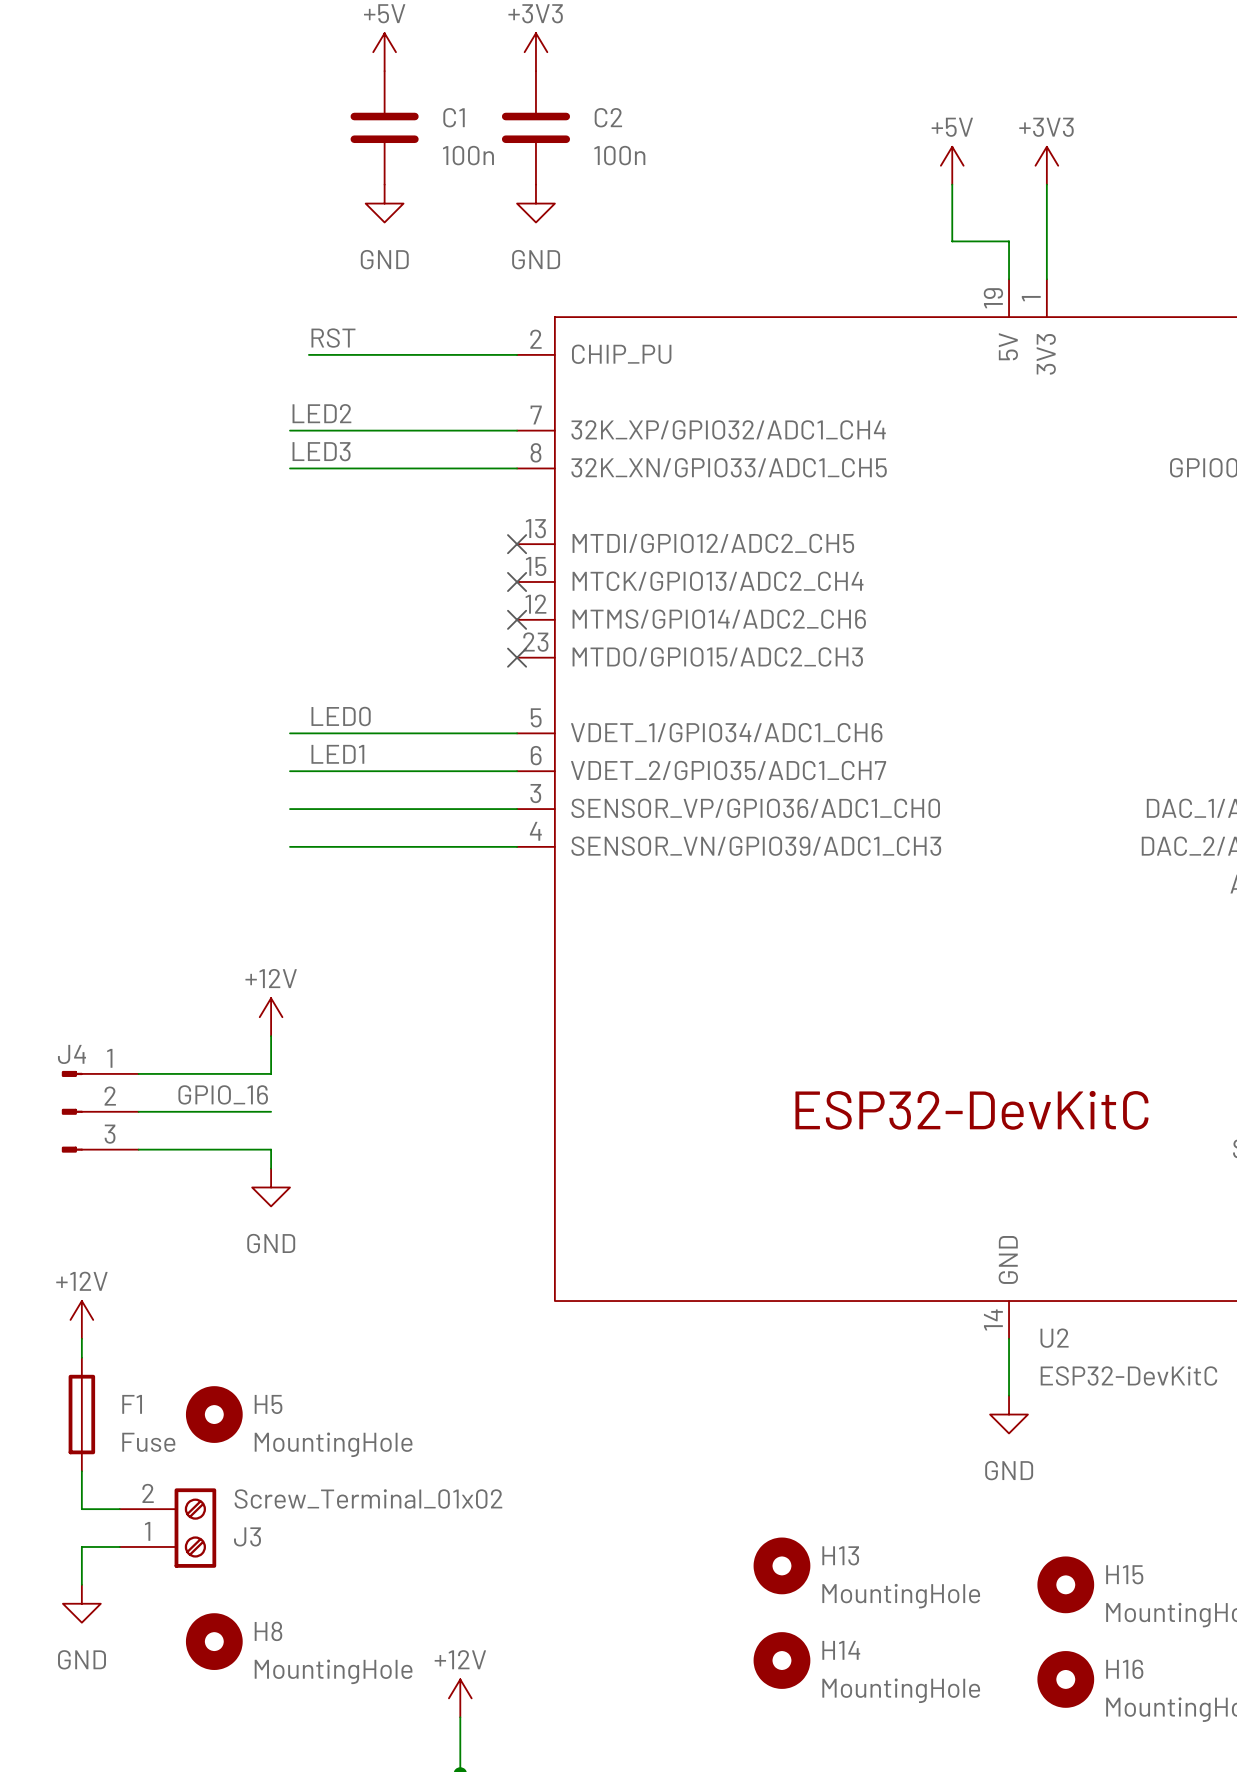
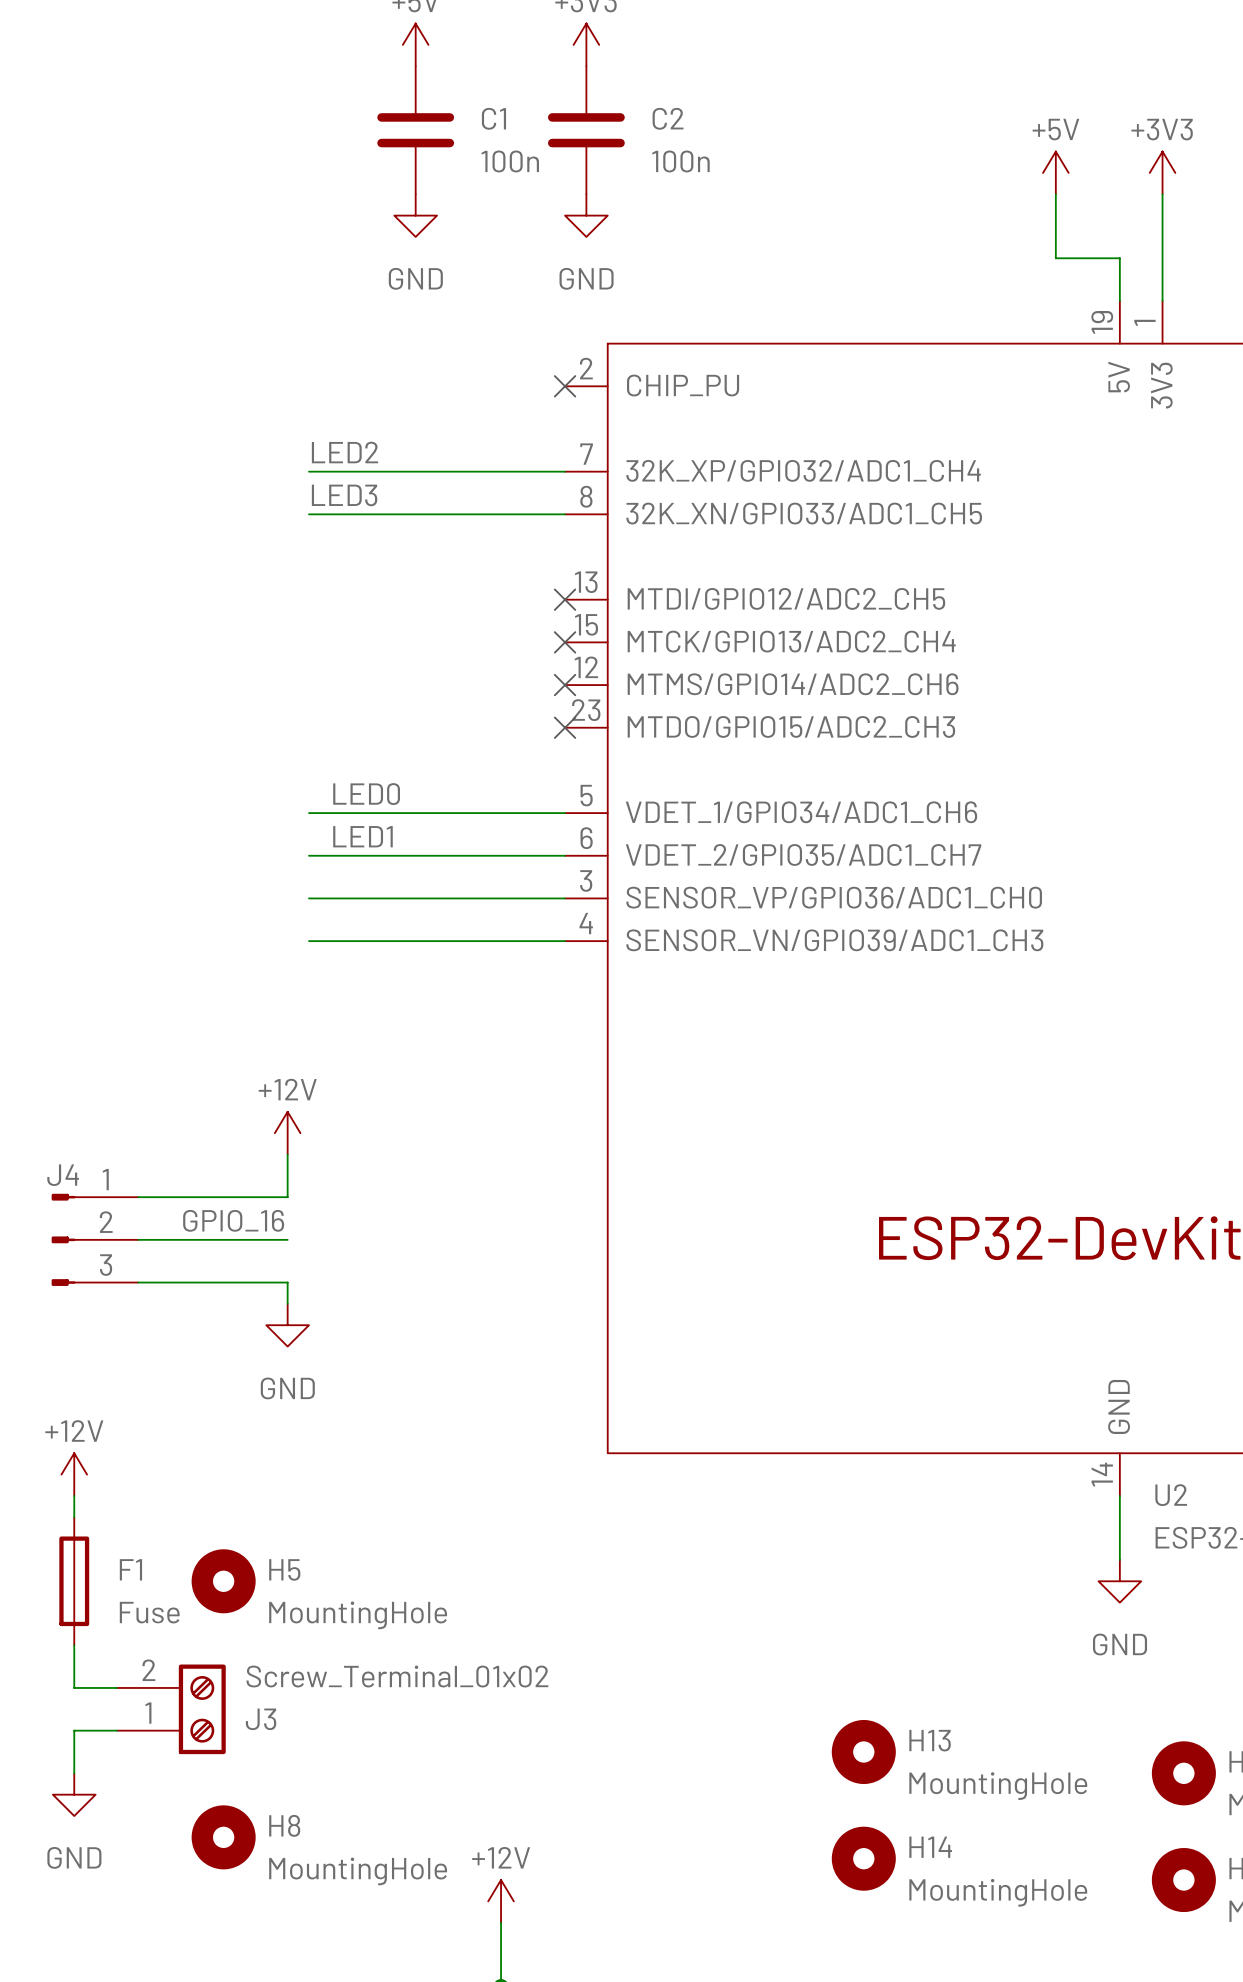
label: RST (333, 338) -> none
wire: (308, 354) (517, 354) -> none
no-connect mark: none -> (565, 386)

